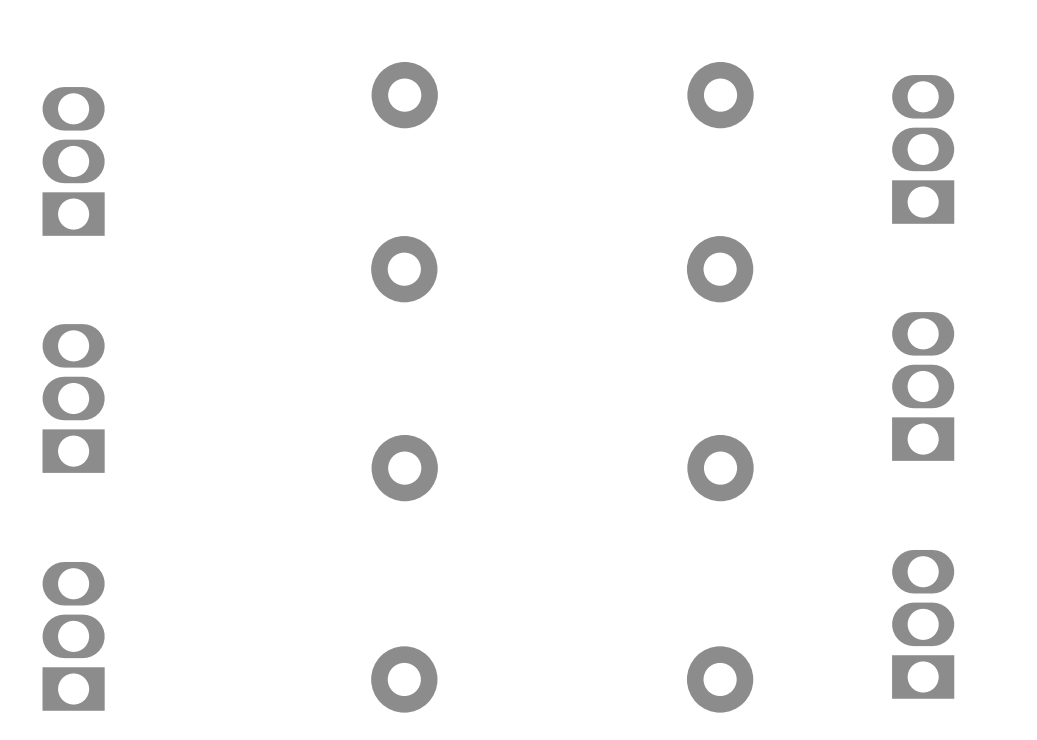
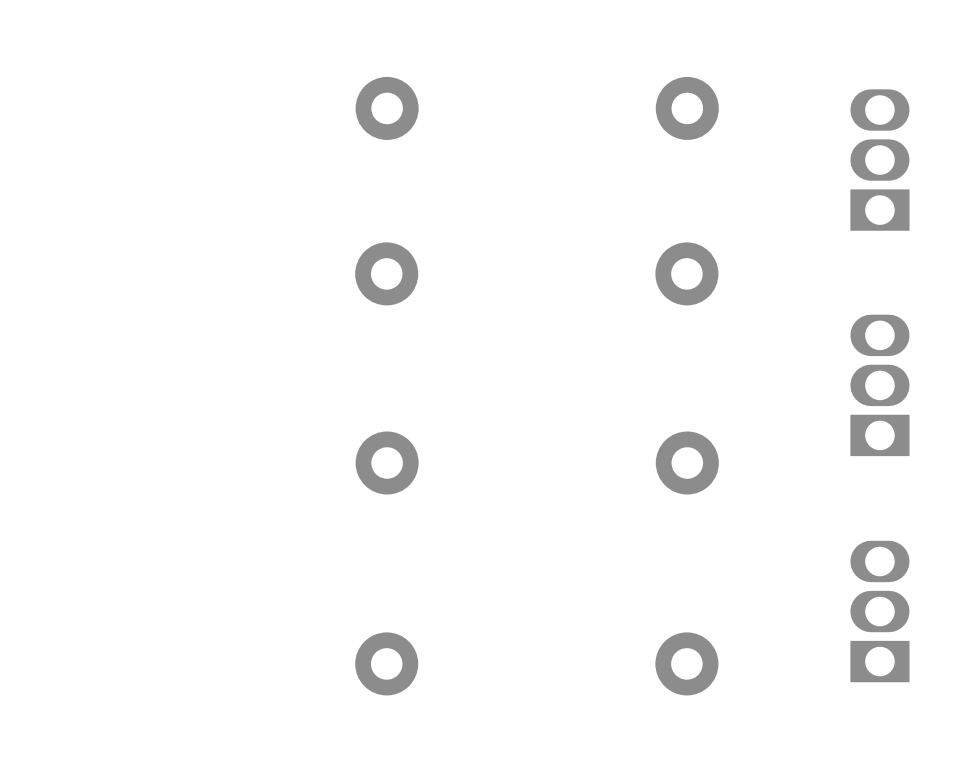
part: (73, 161) -> none
part: (73, 398) -> none
part: (73, 636) -> none

